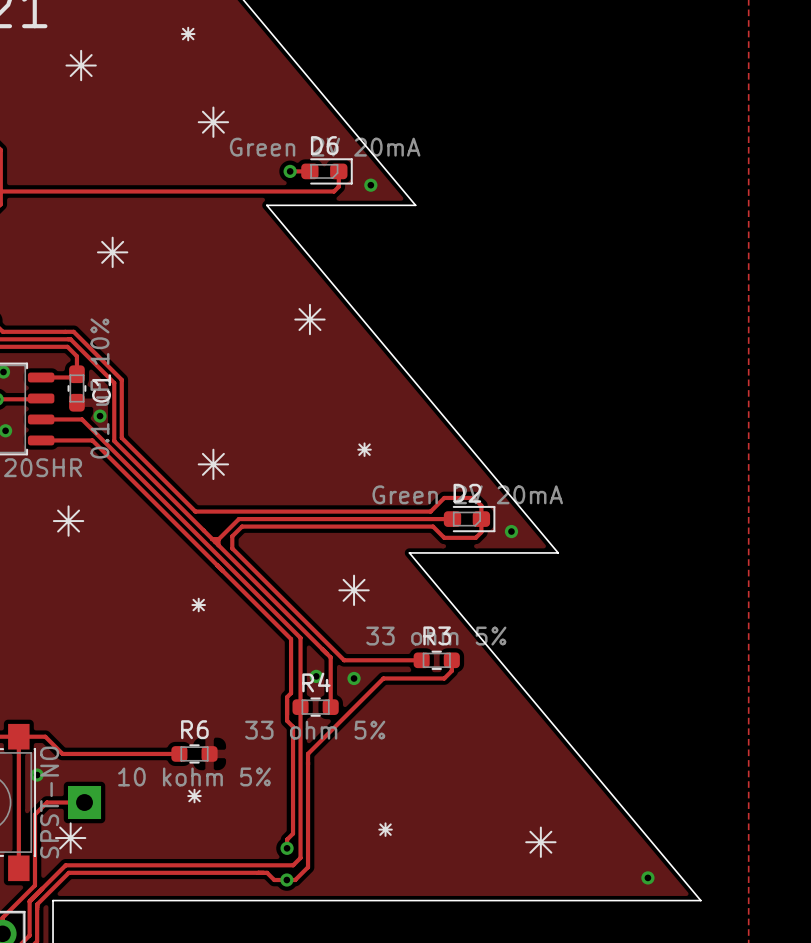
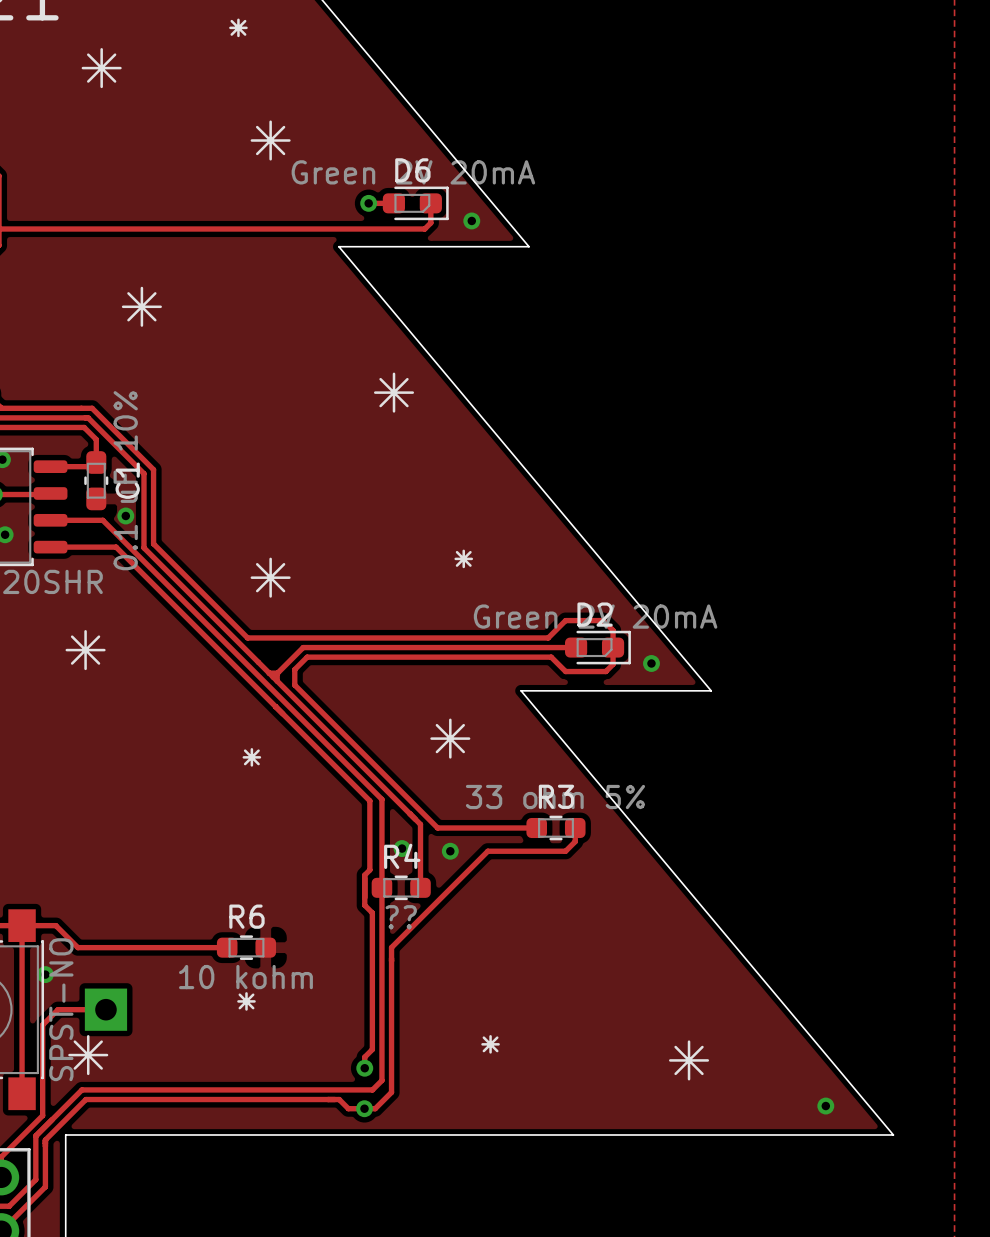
R4 value: 33 ohm 5% (315, 730) -> ?? (401, 917)
R6 value: 10 kohm 5% (194, 776) -> 10 kohm (245, 977)

